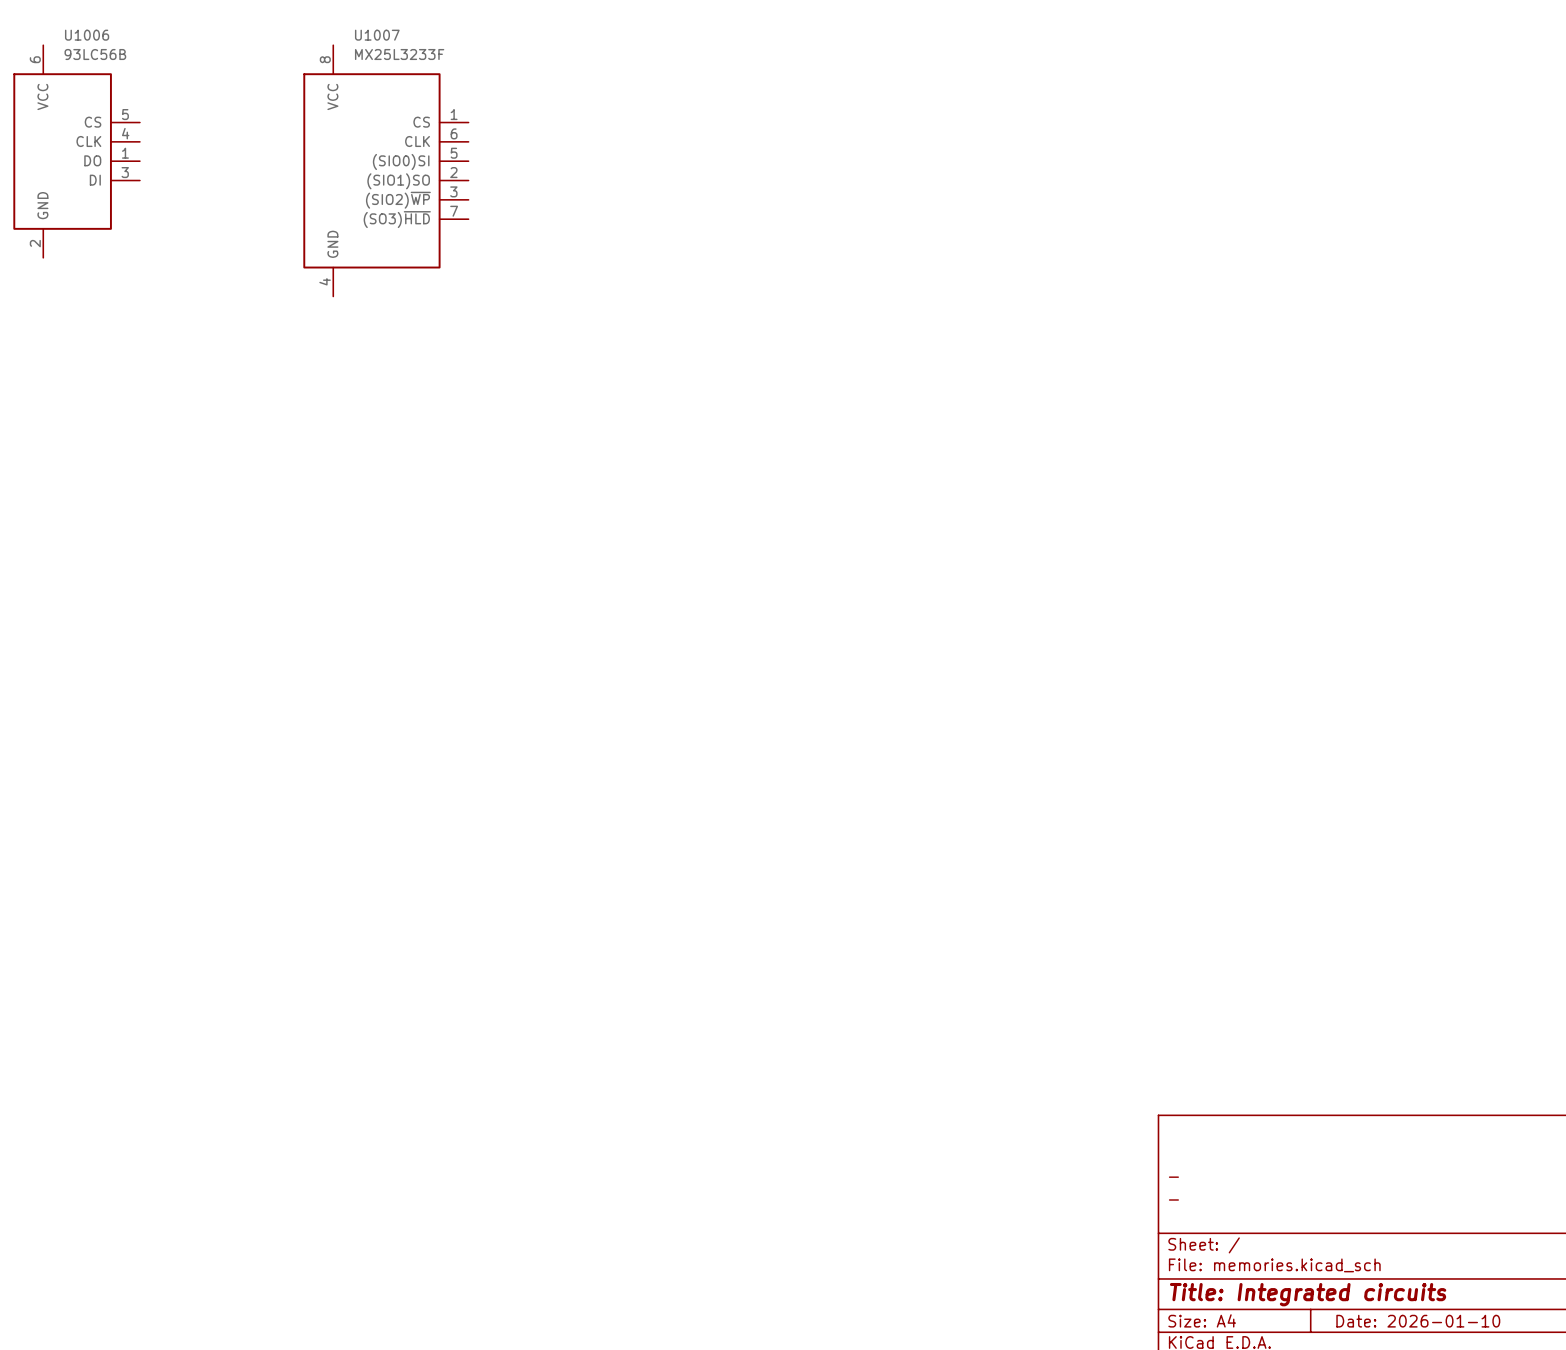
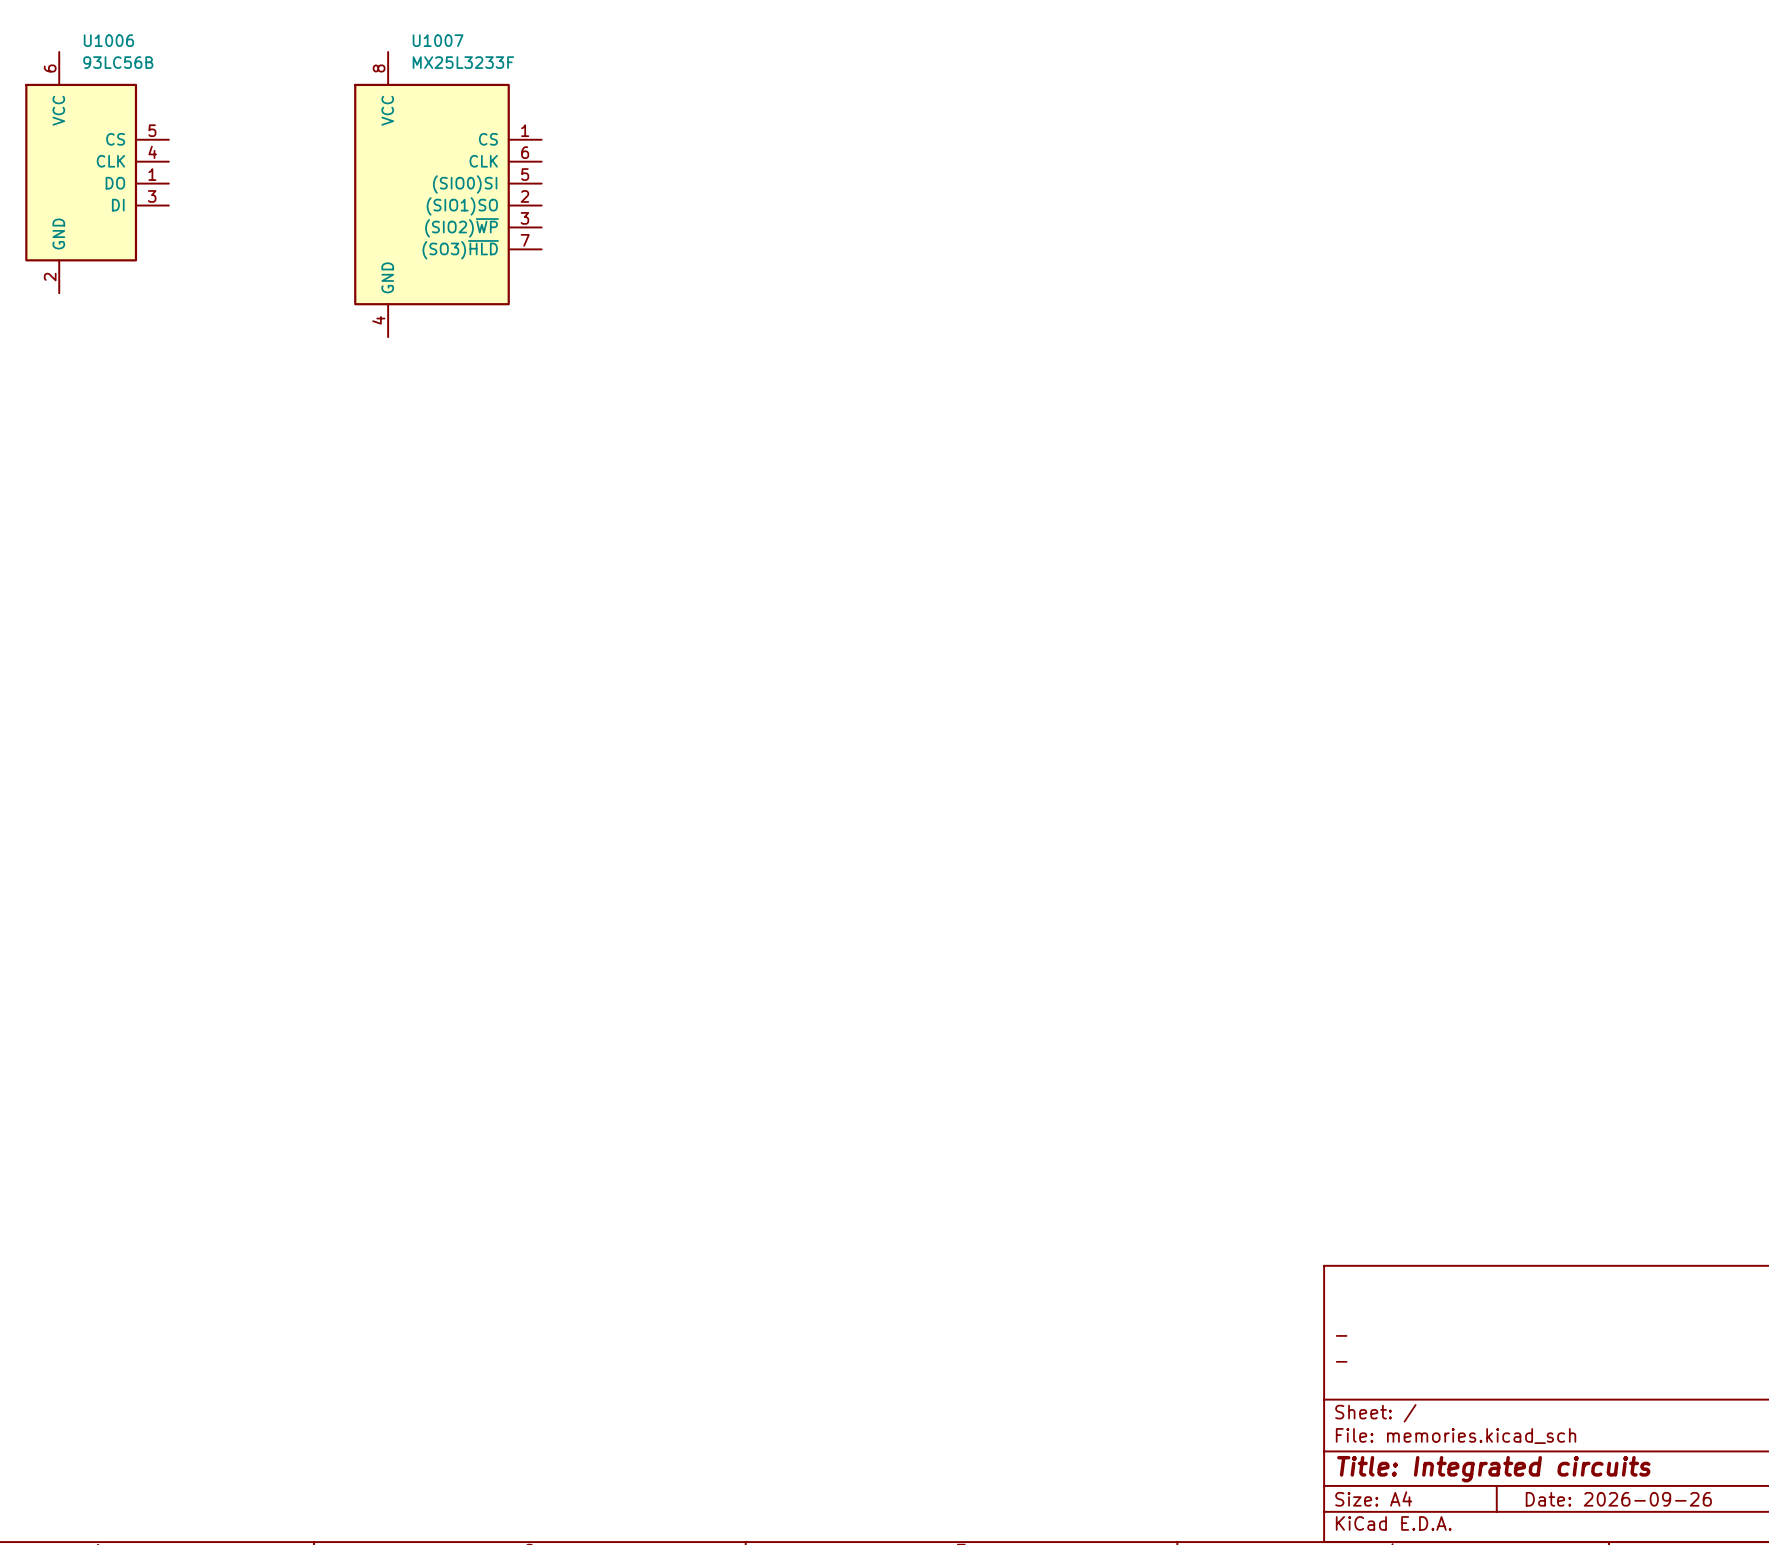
title block: Date: 2026-01-10 (1418, 1321) -> Date: 2026-09-26 (1618, 1499)

